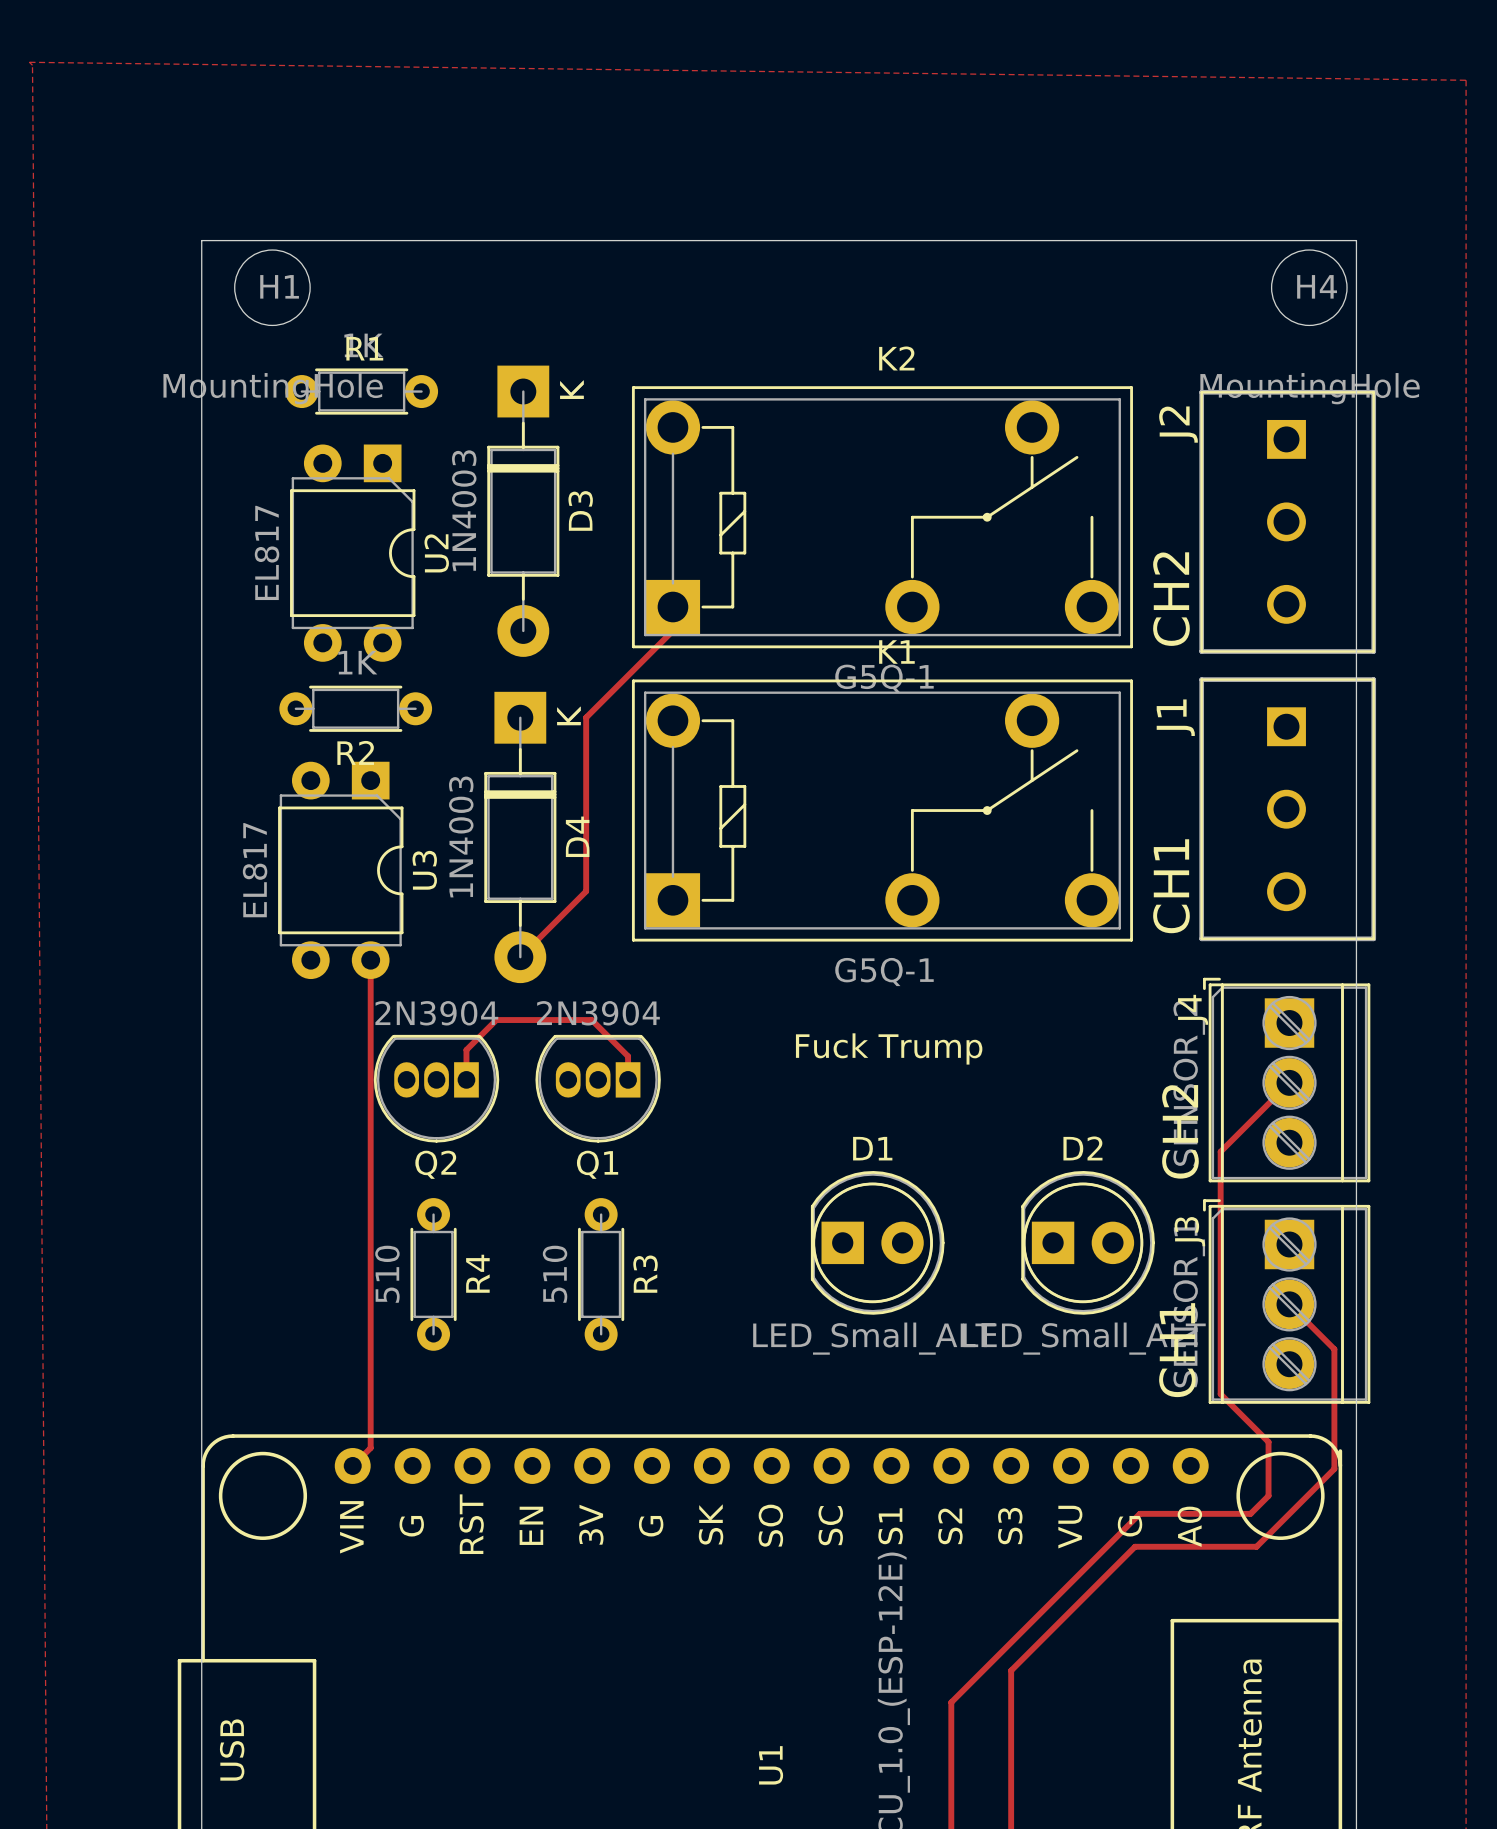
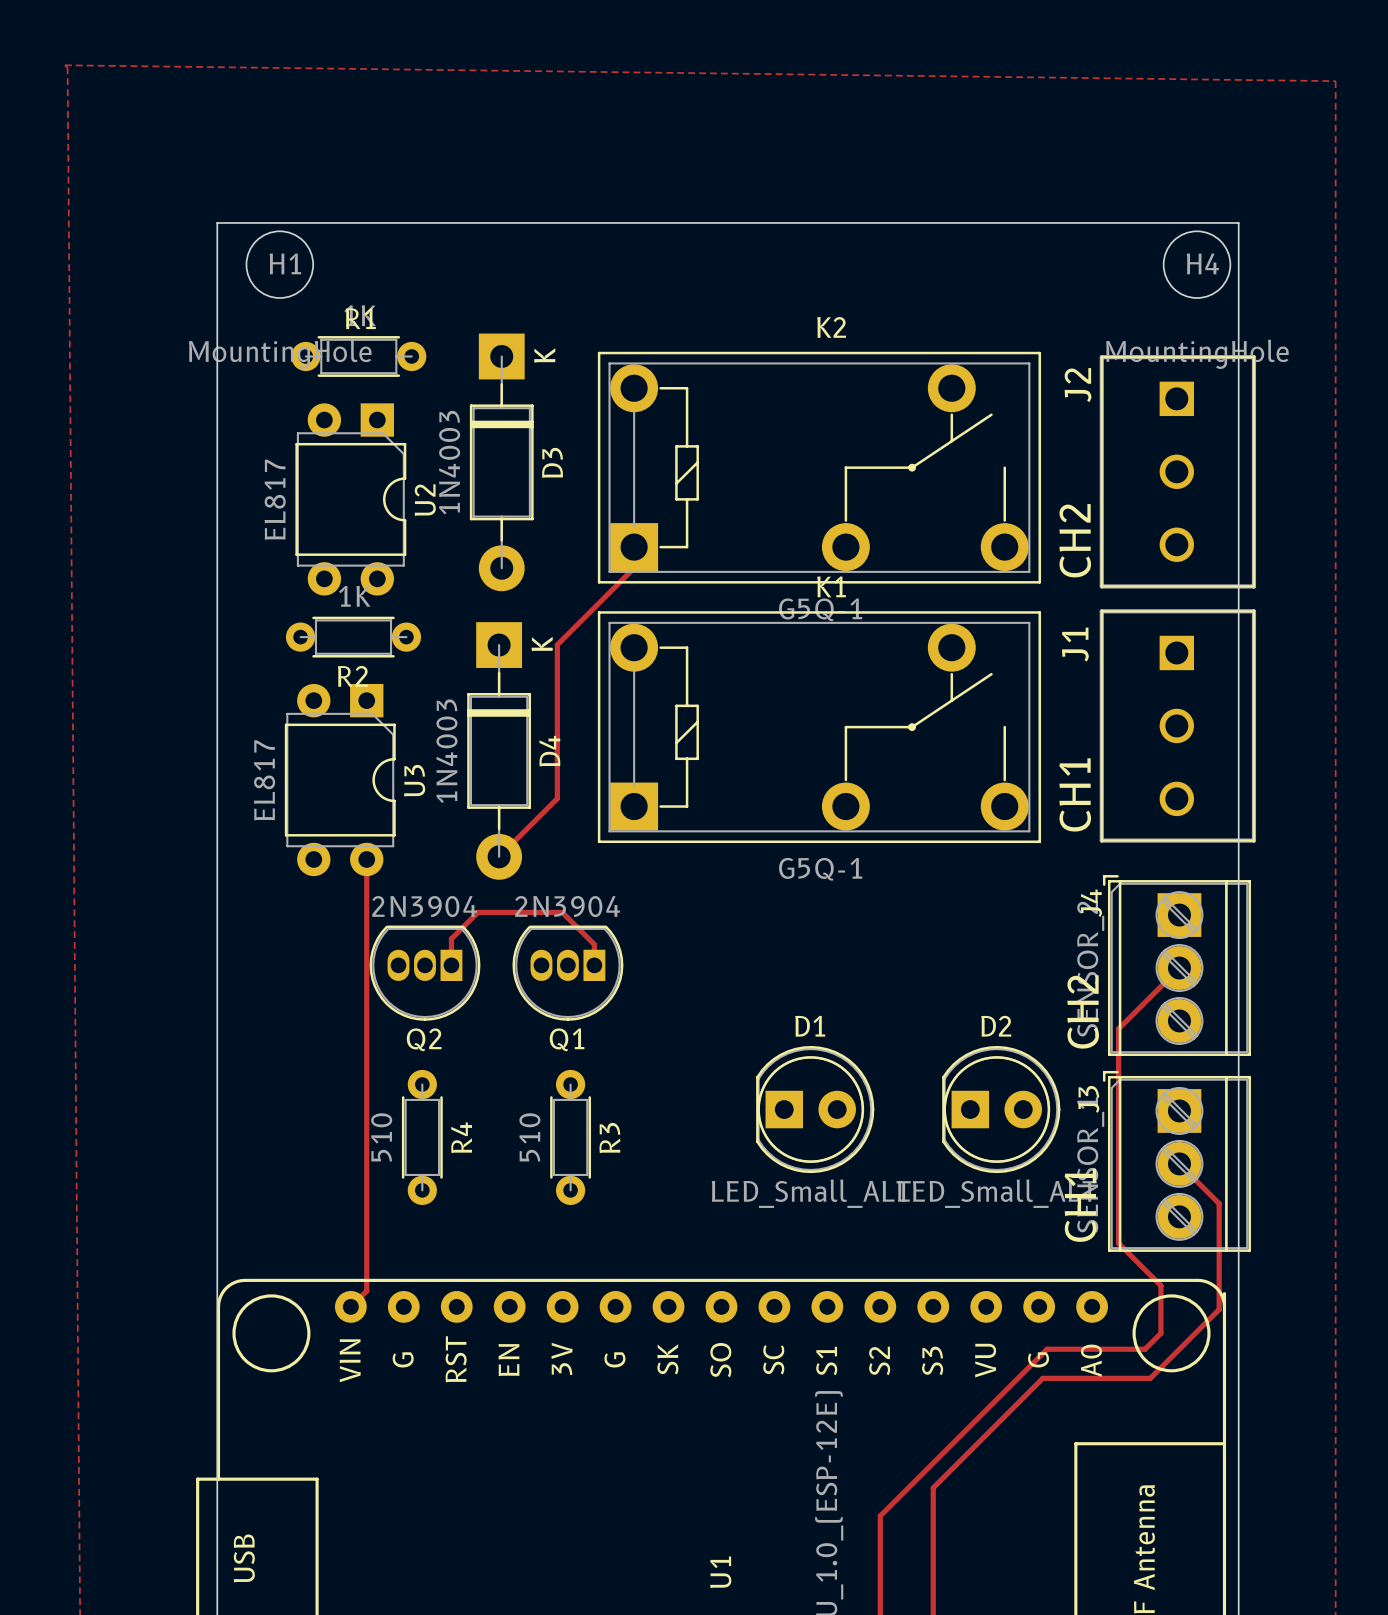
text: Fuck Trump (889, 1048) -> none

